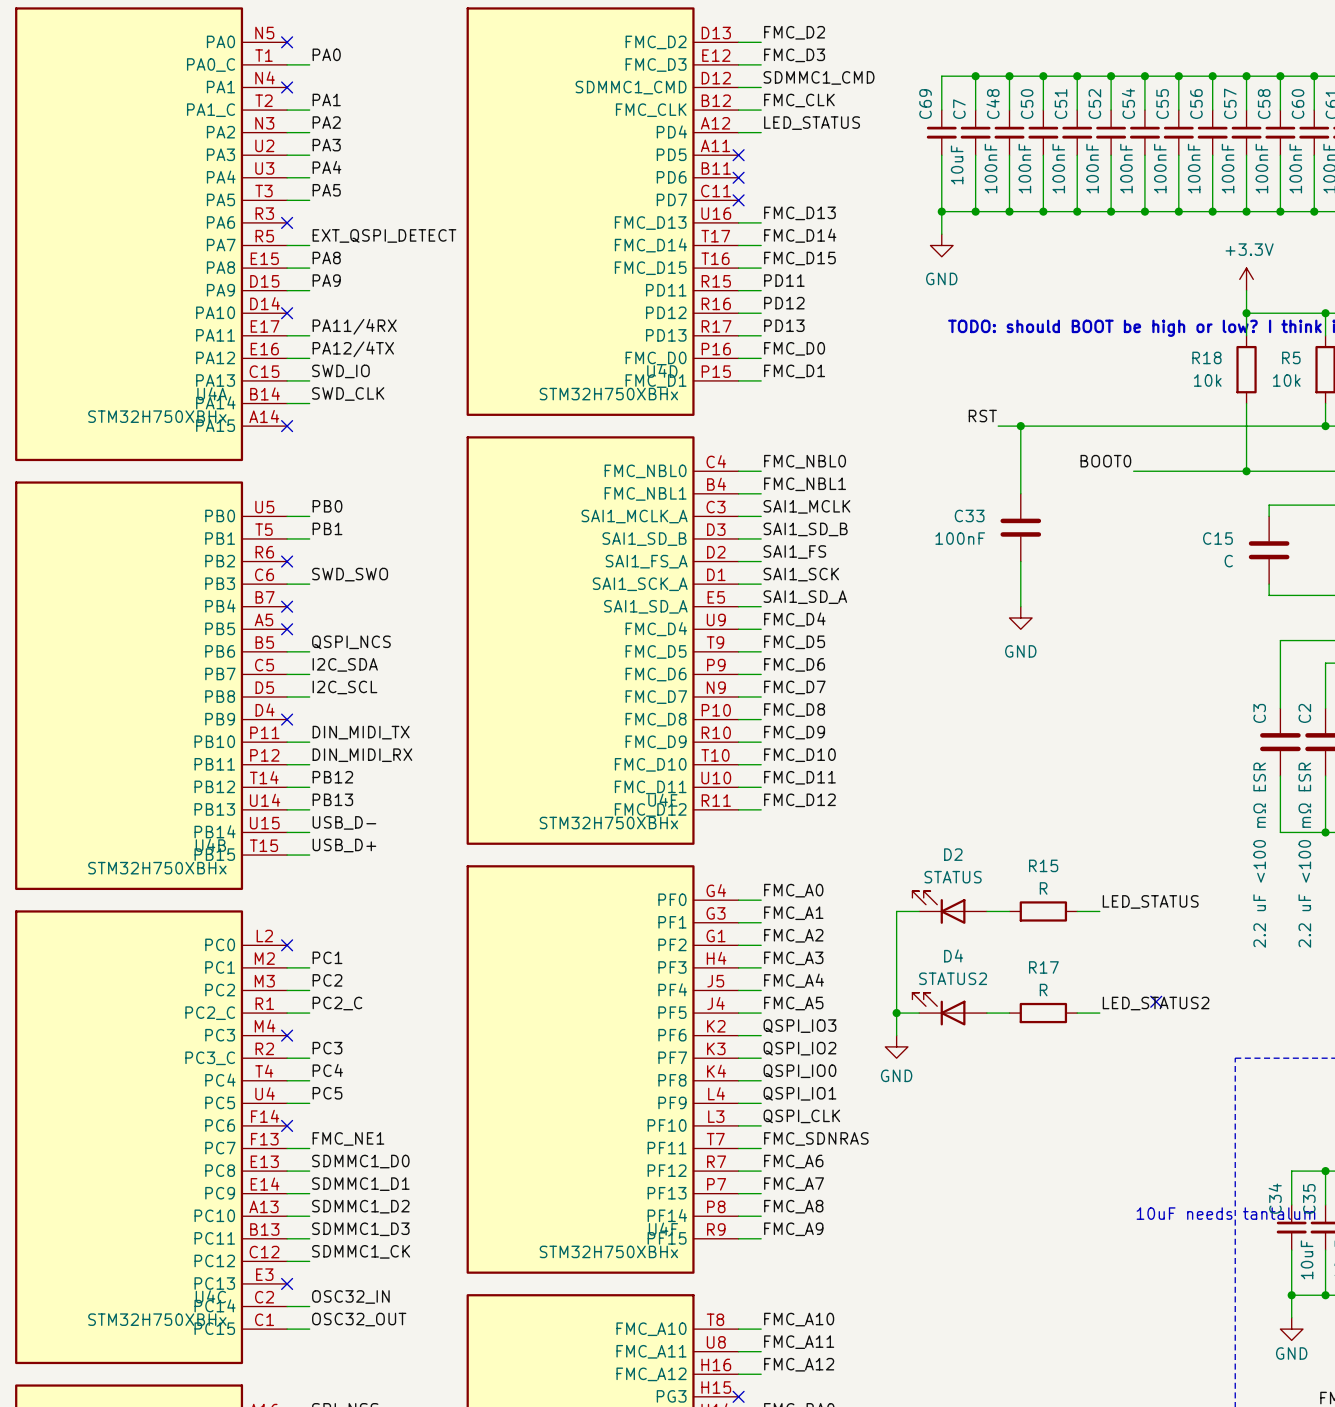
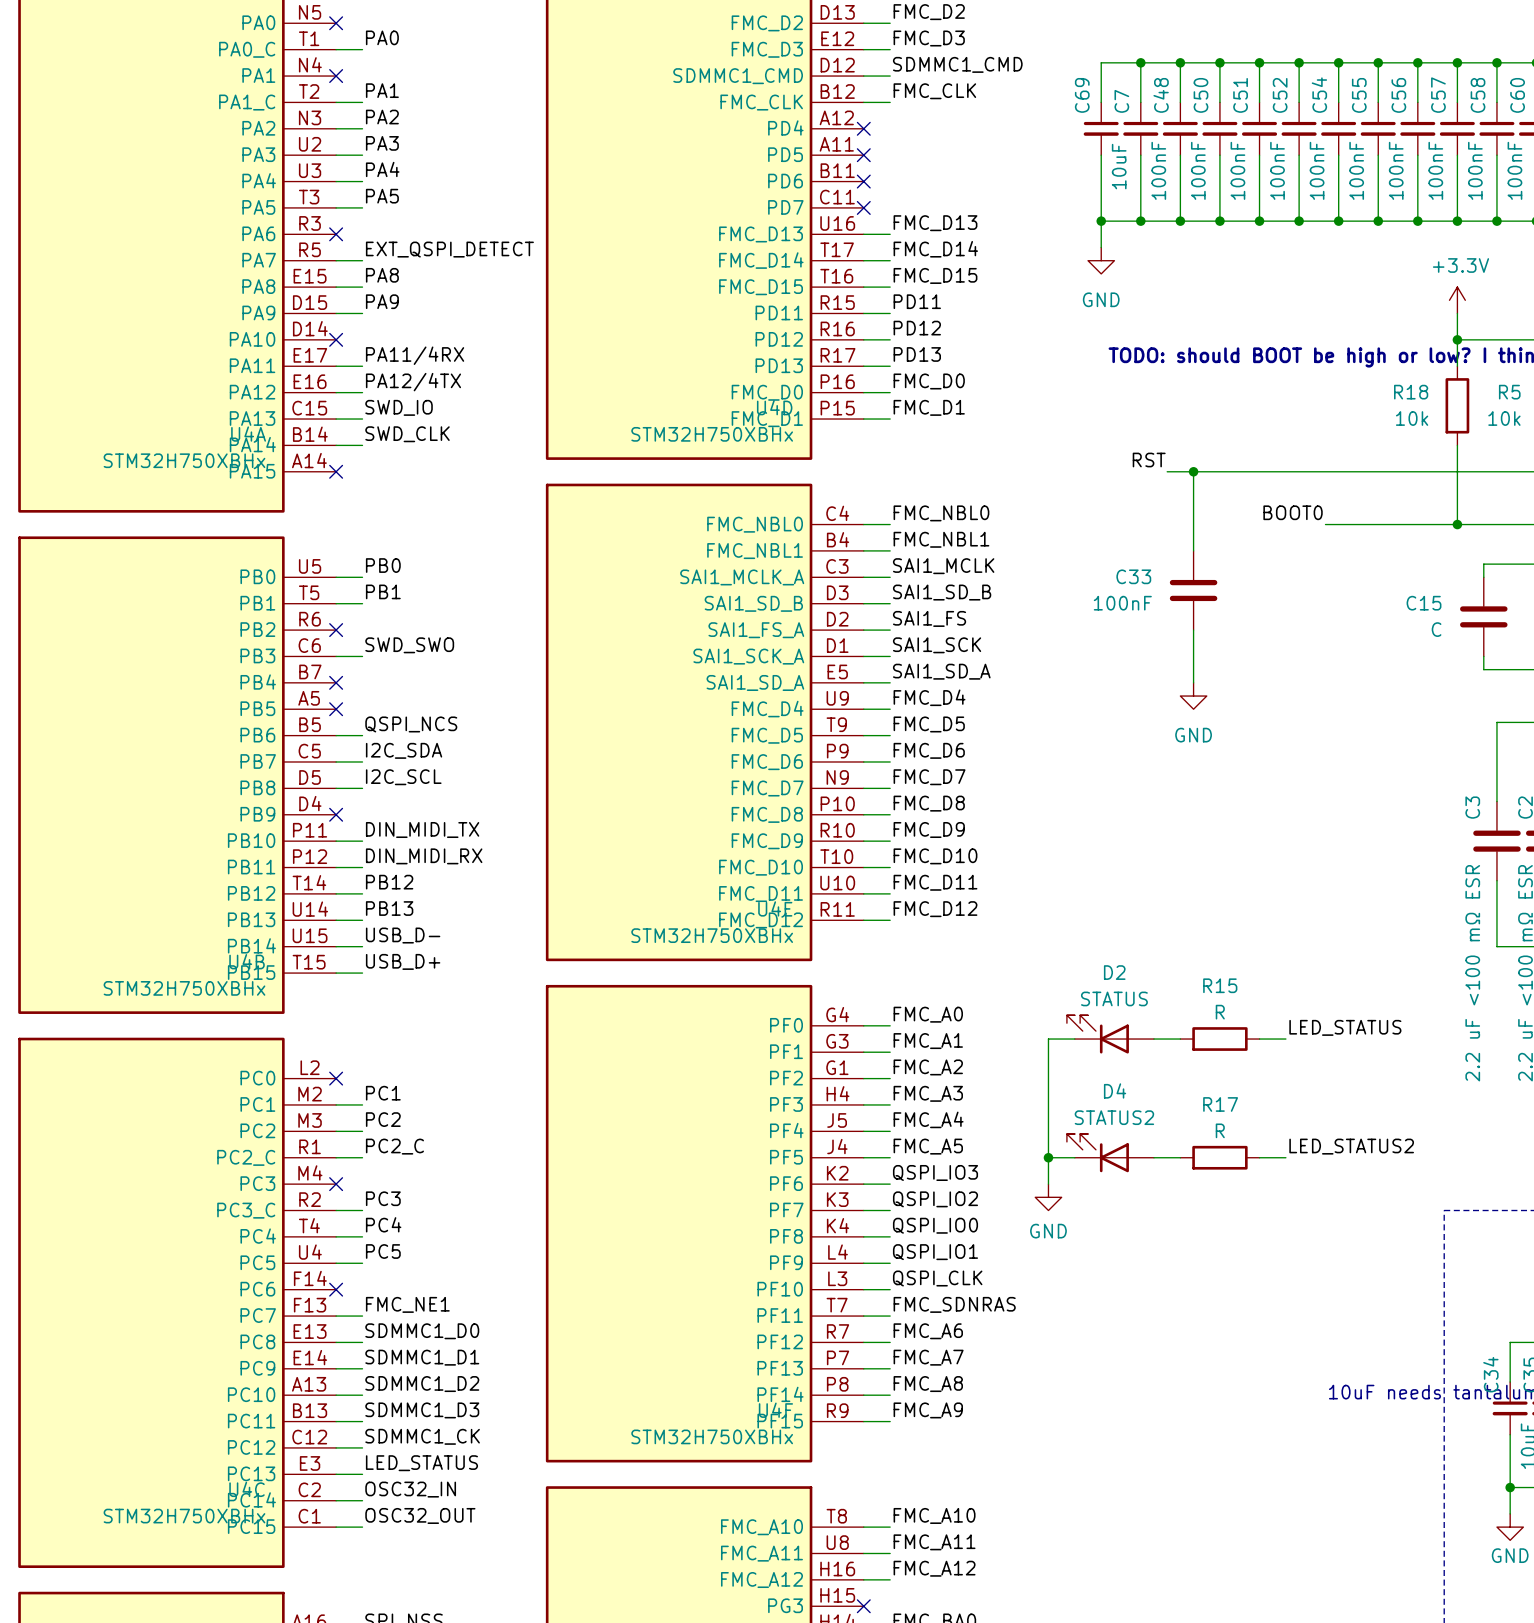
label: LED_STATUS (812, 123) -> none
wire: (738, 132) (761, 132) -> none
no-connect mark: none -> (863, 128)
no-connect mark: (1156, 1001) -> none
label: none -> LED_STATUS (421, 1463)
wire: none -> (336, 1474) (362, 1474)
no-connect mark: (287, 1283) -> none

